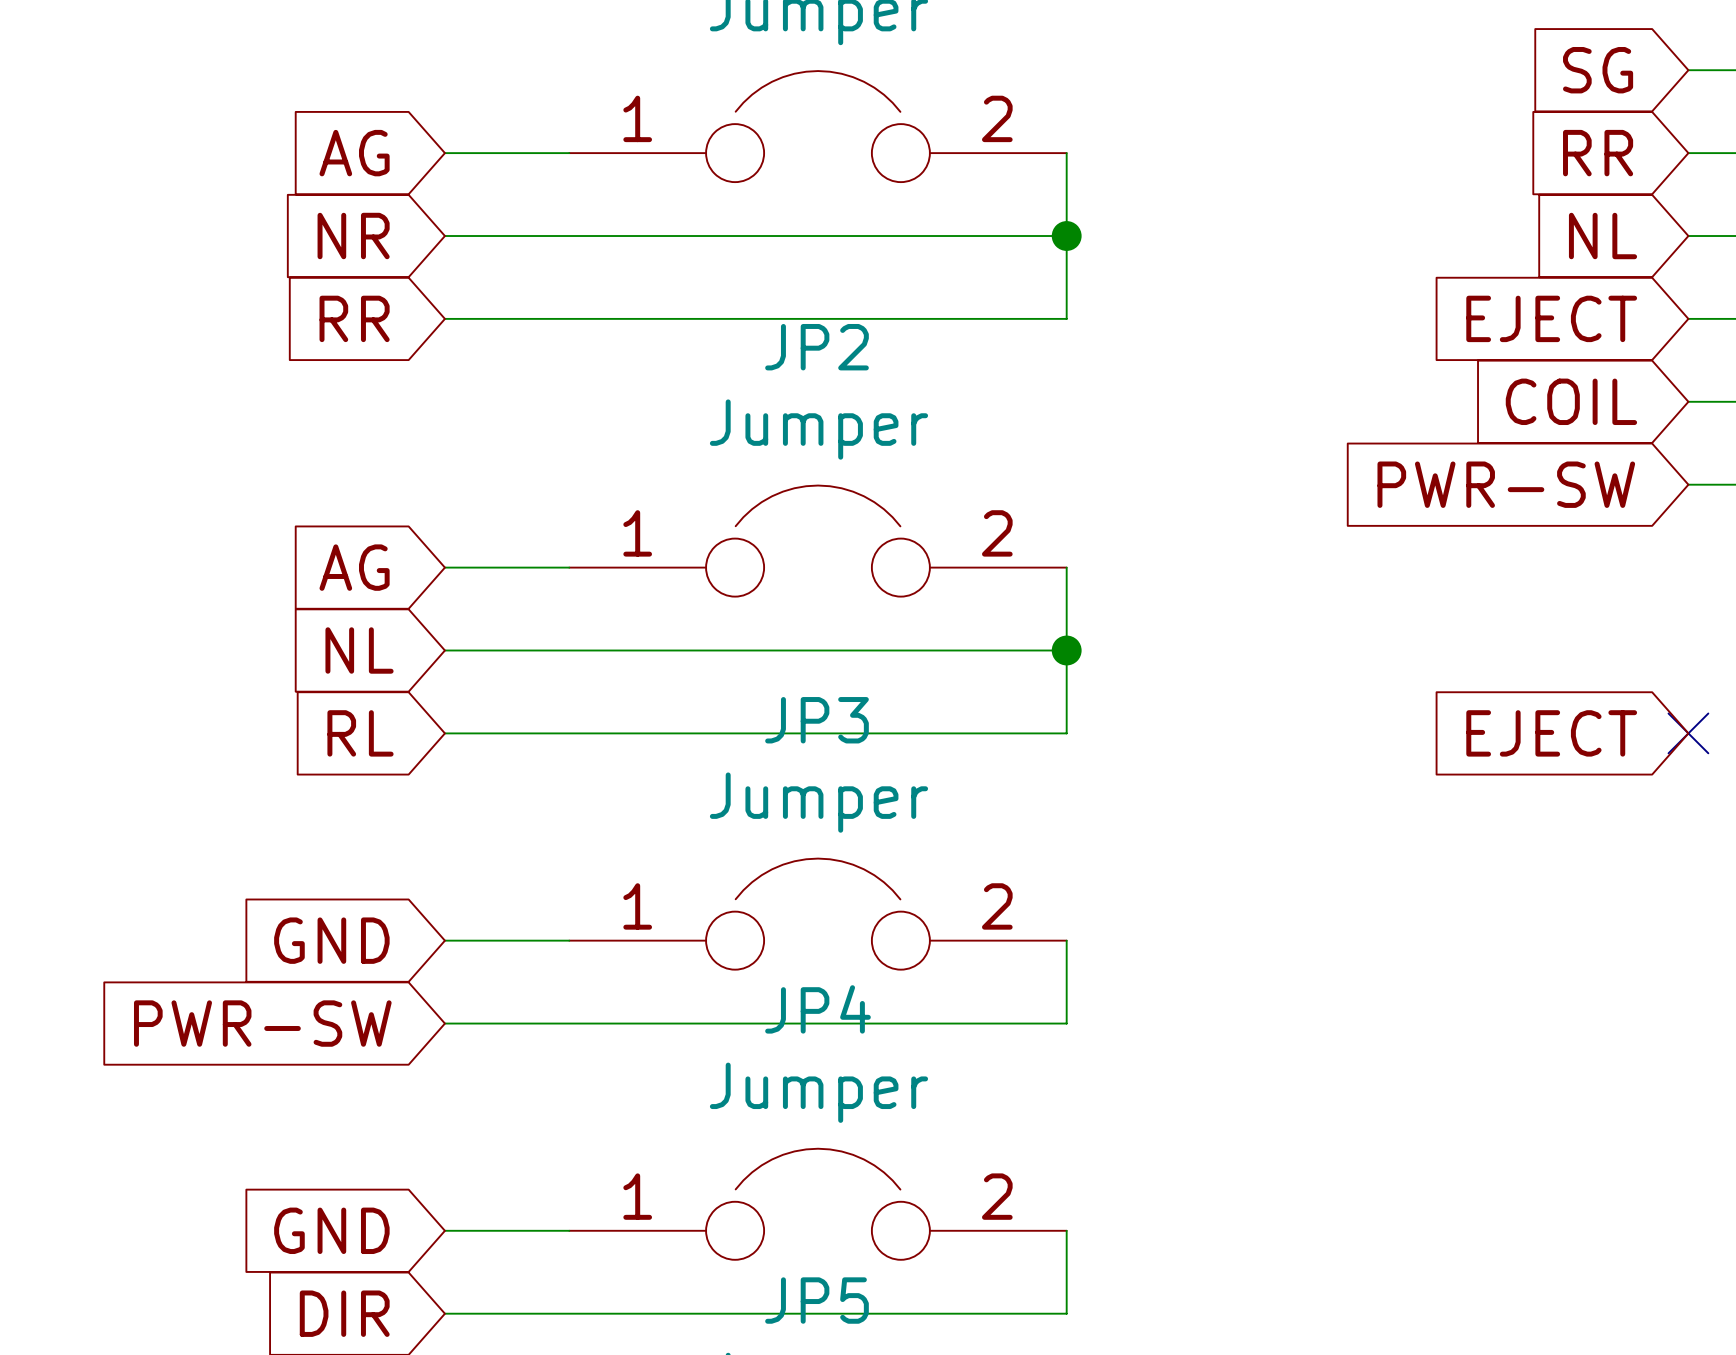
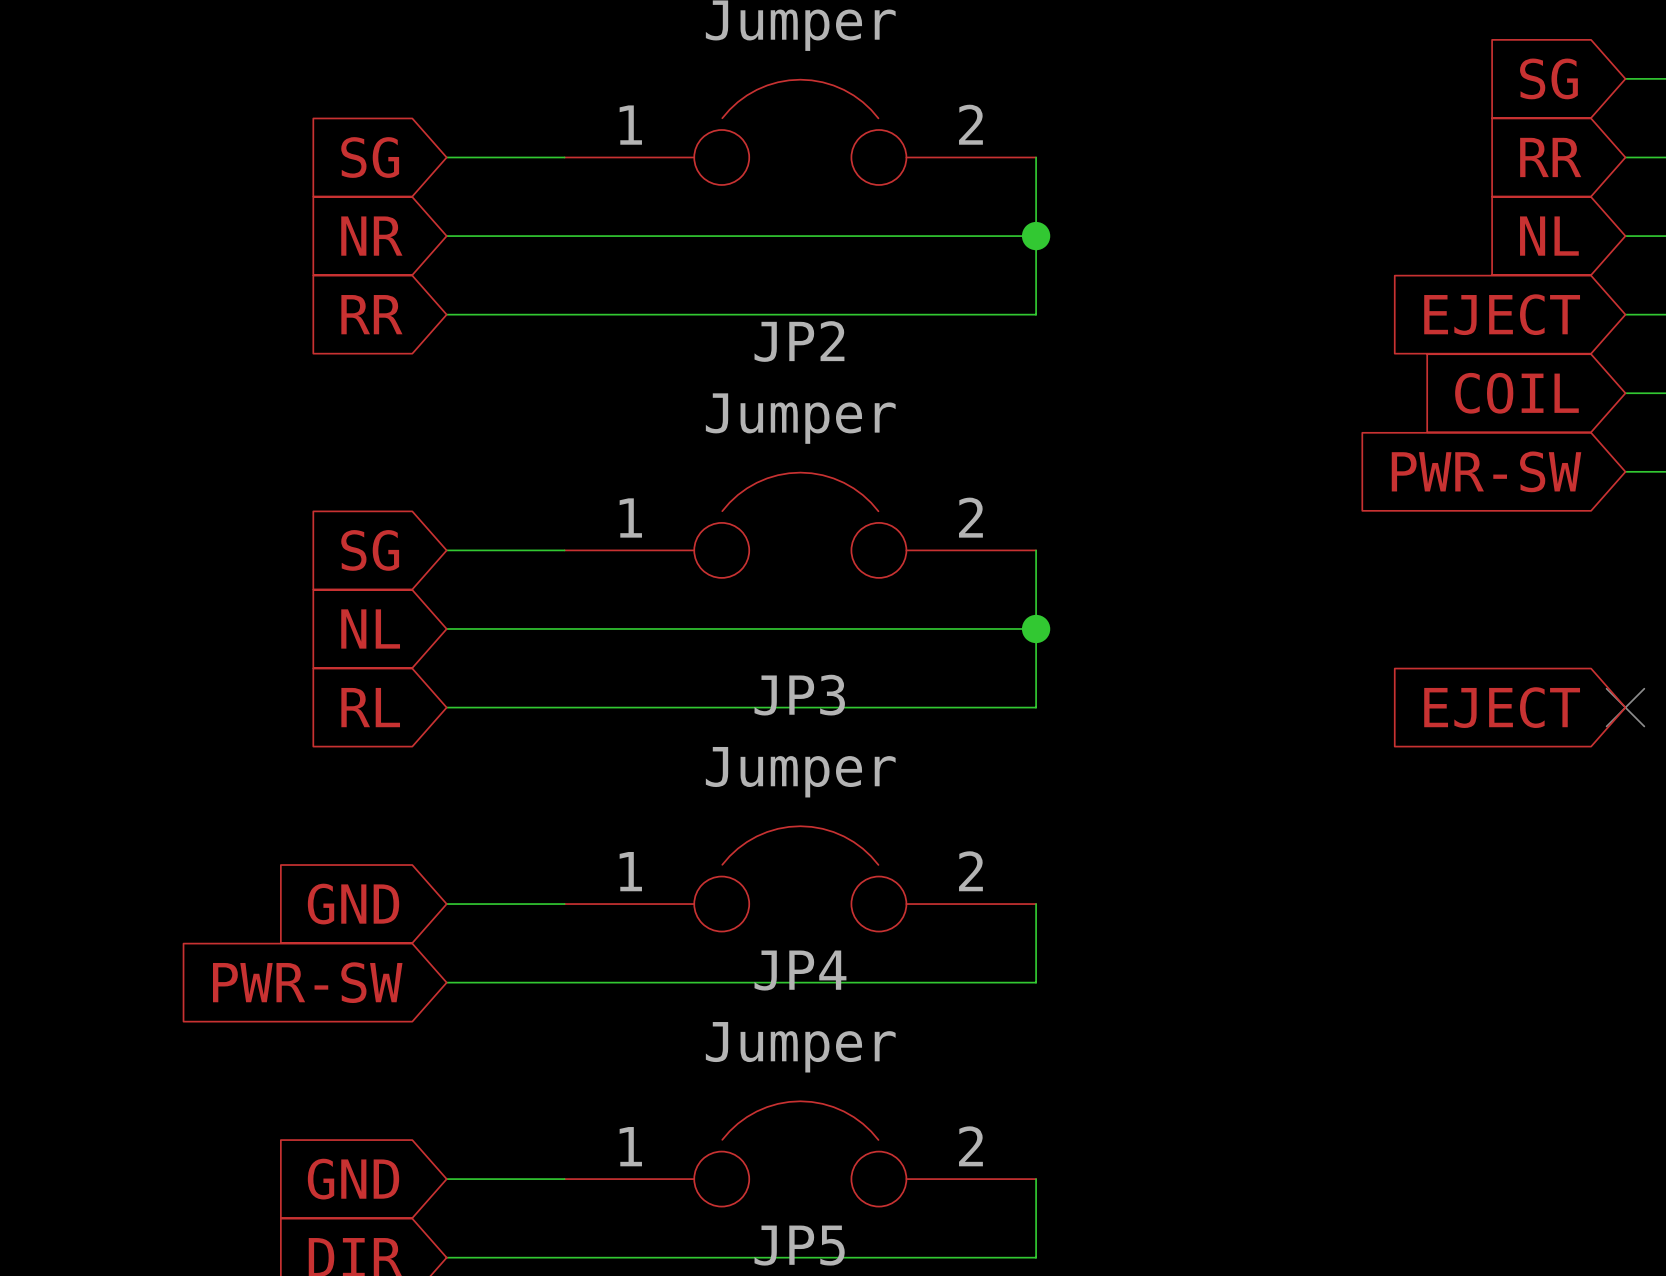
global label: AG (354, 153) -> SG (370, 157)
global label: AG (354, 567) -> SG (370, 550)

